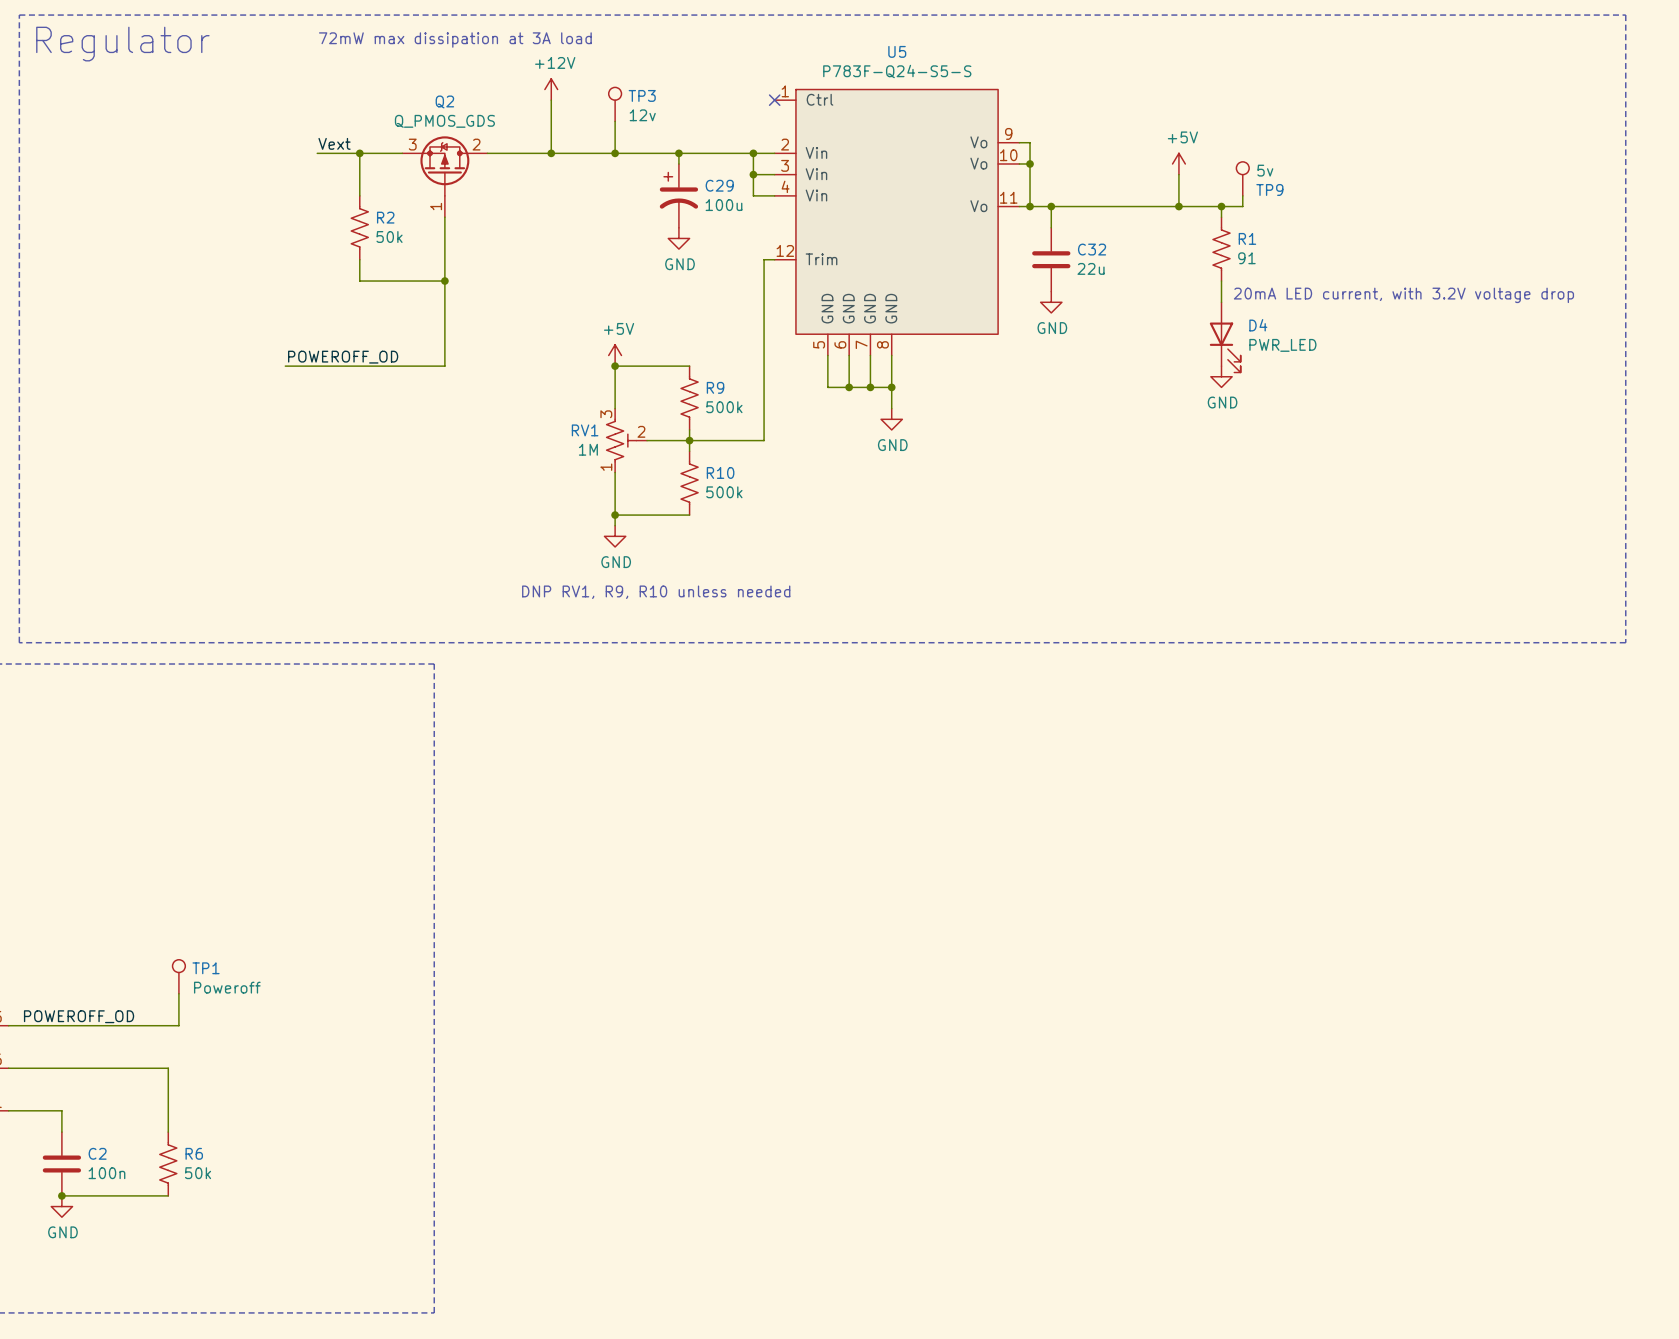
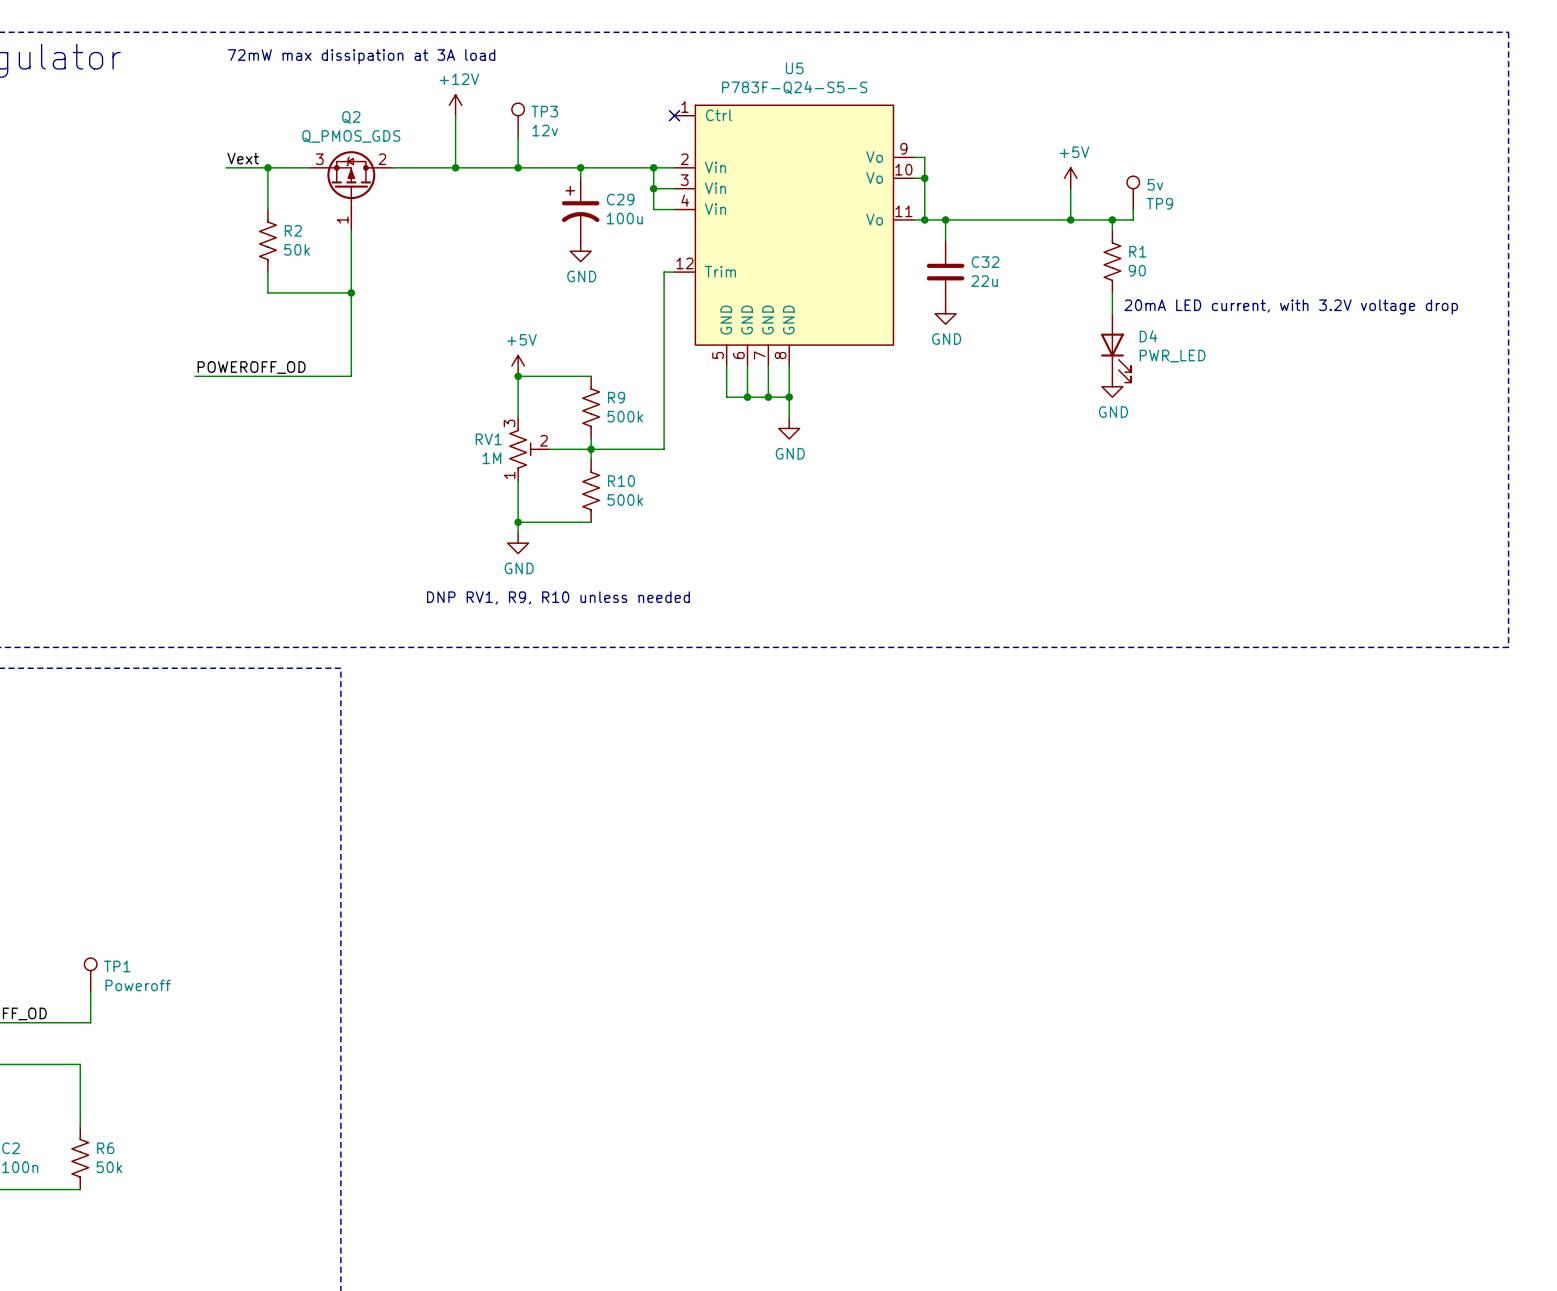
R1 value: 91 (1246, 258) -> 90 (1137, 270)

